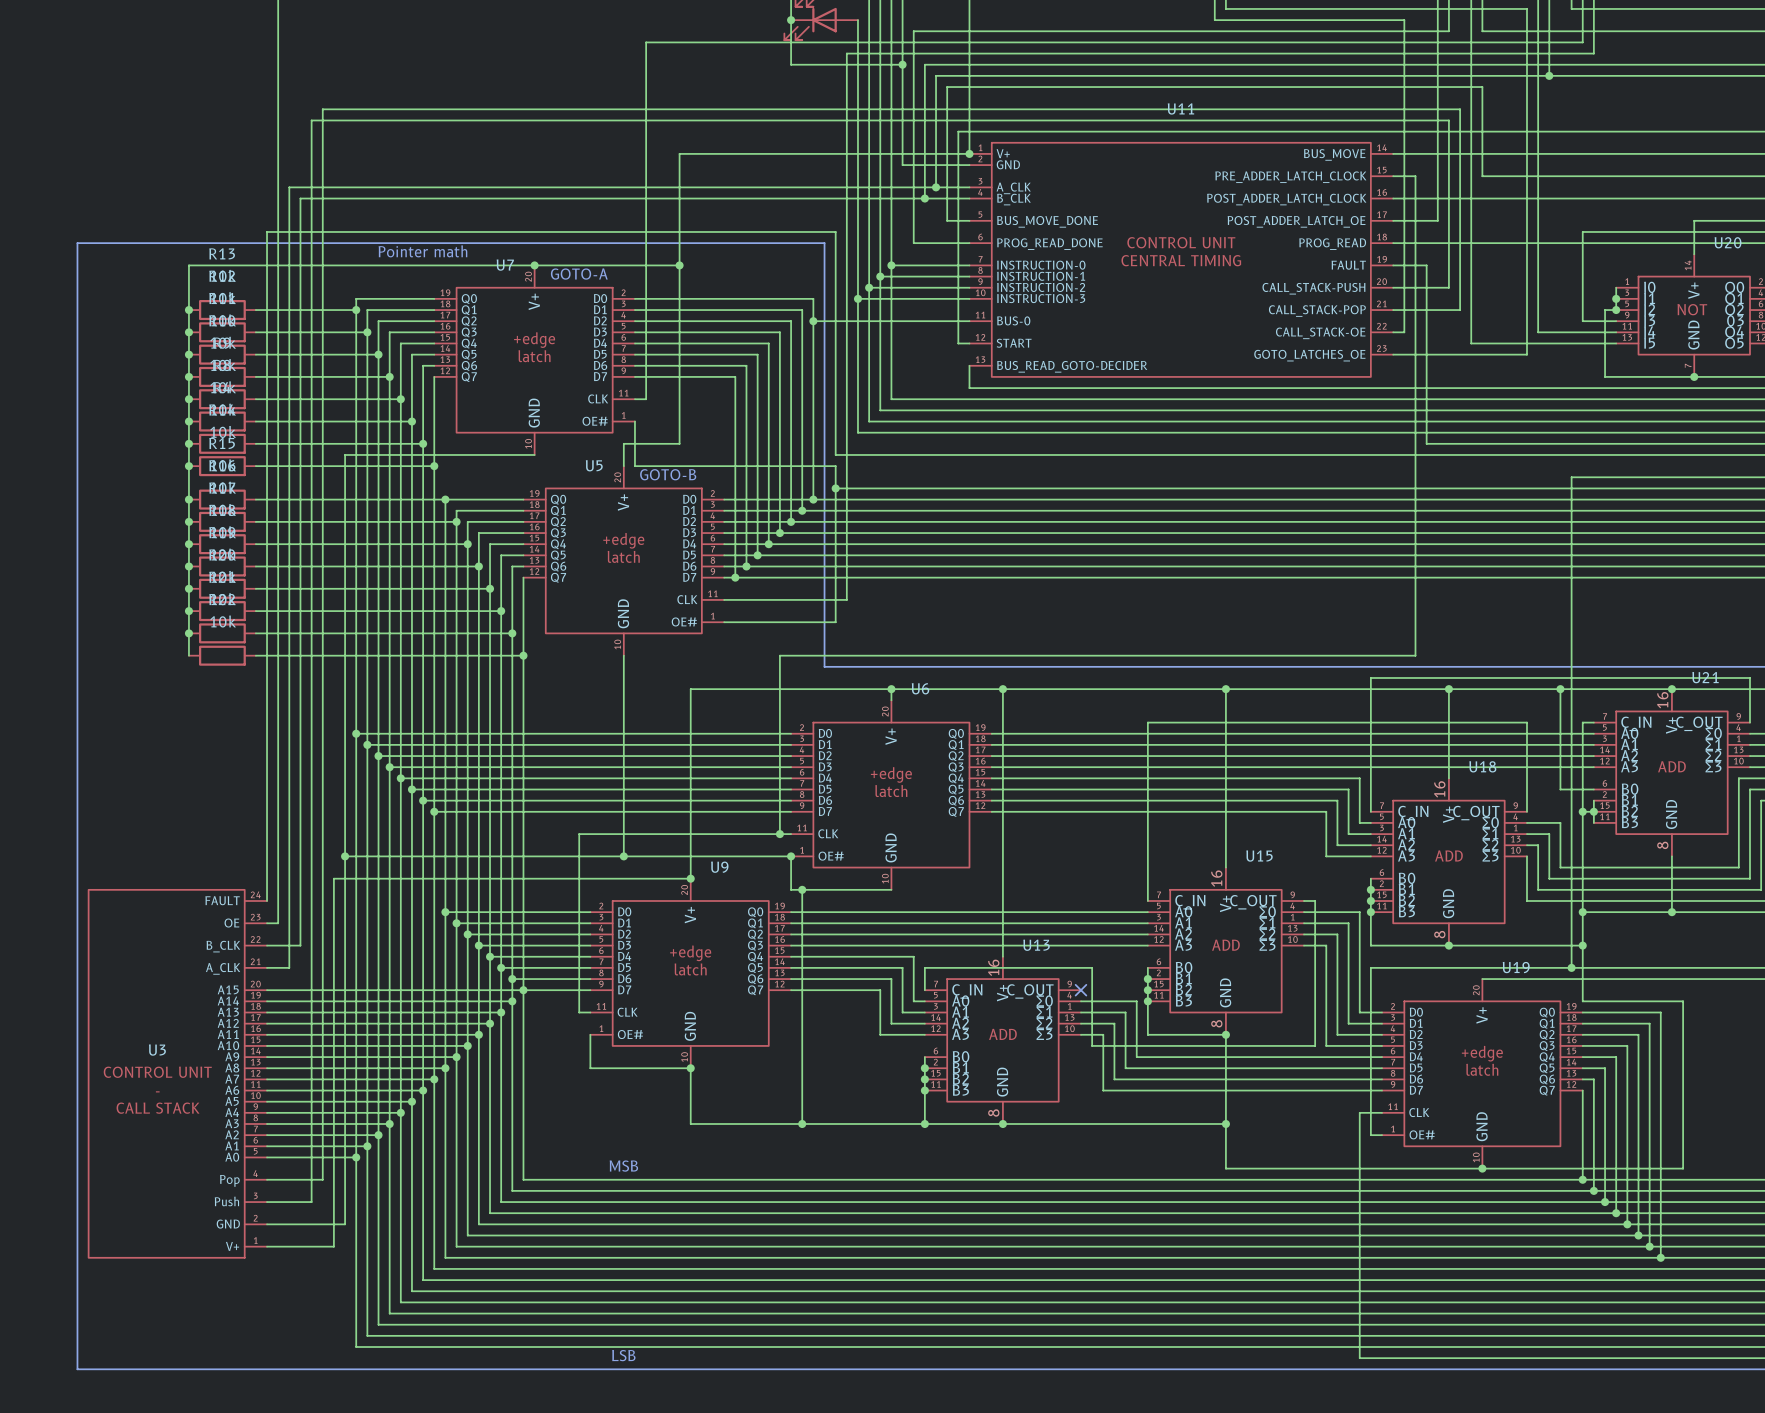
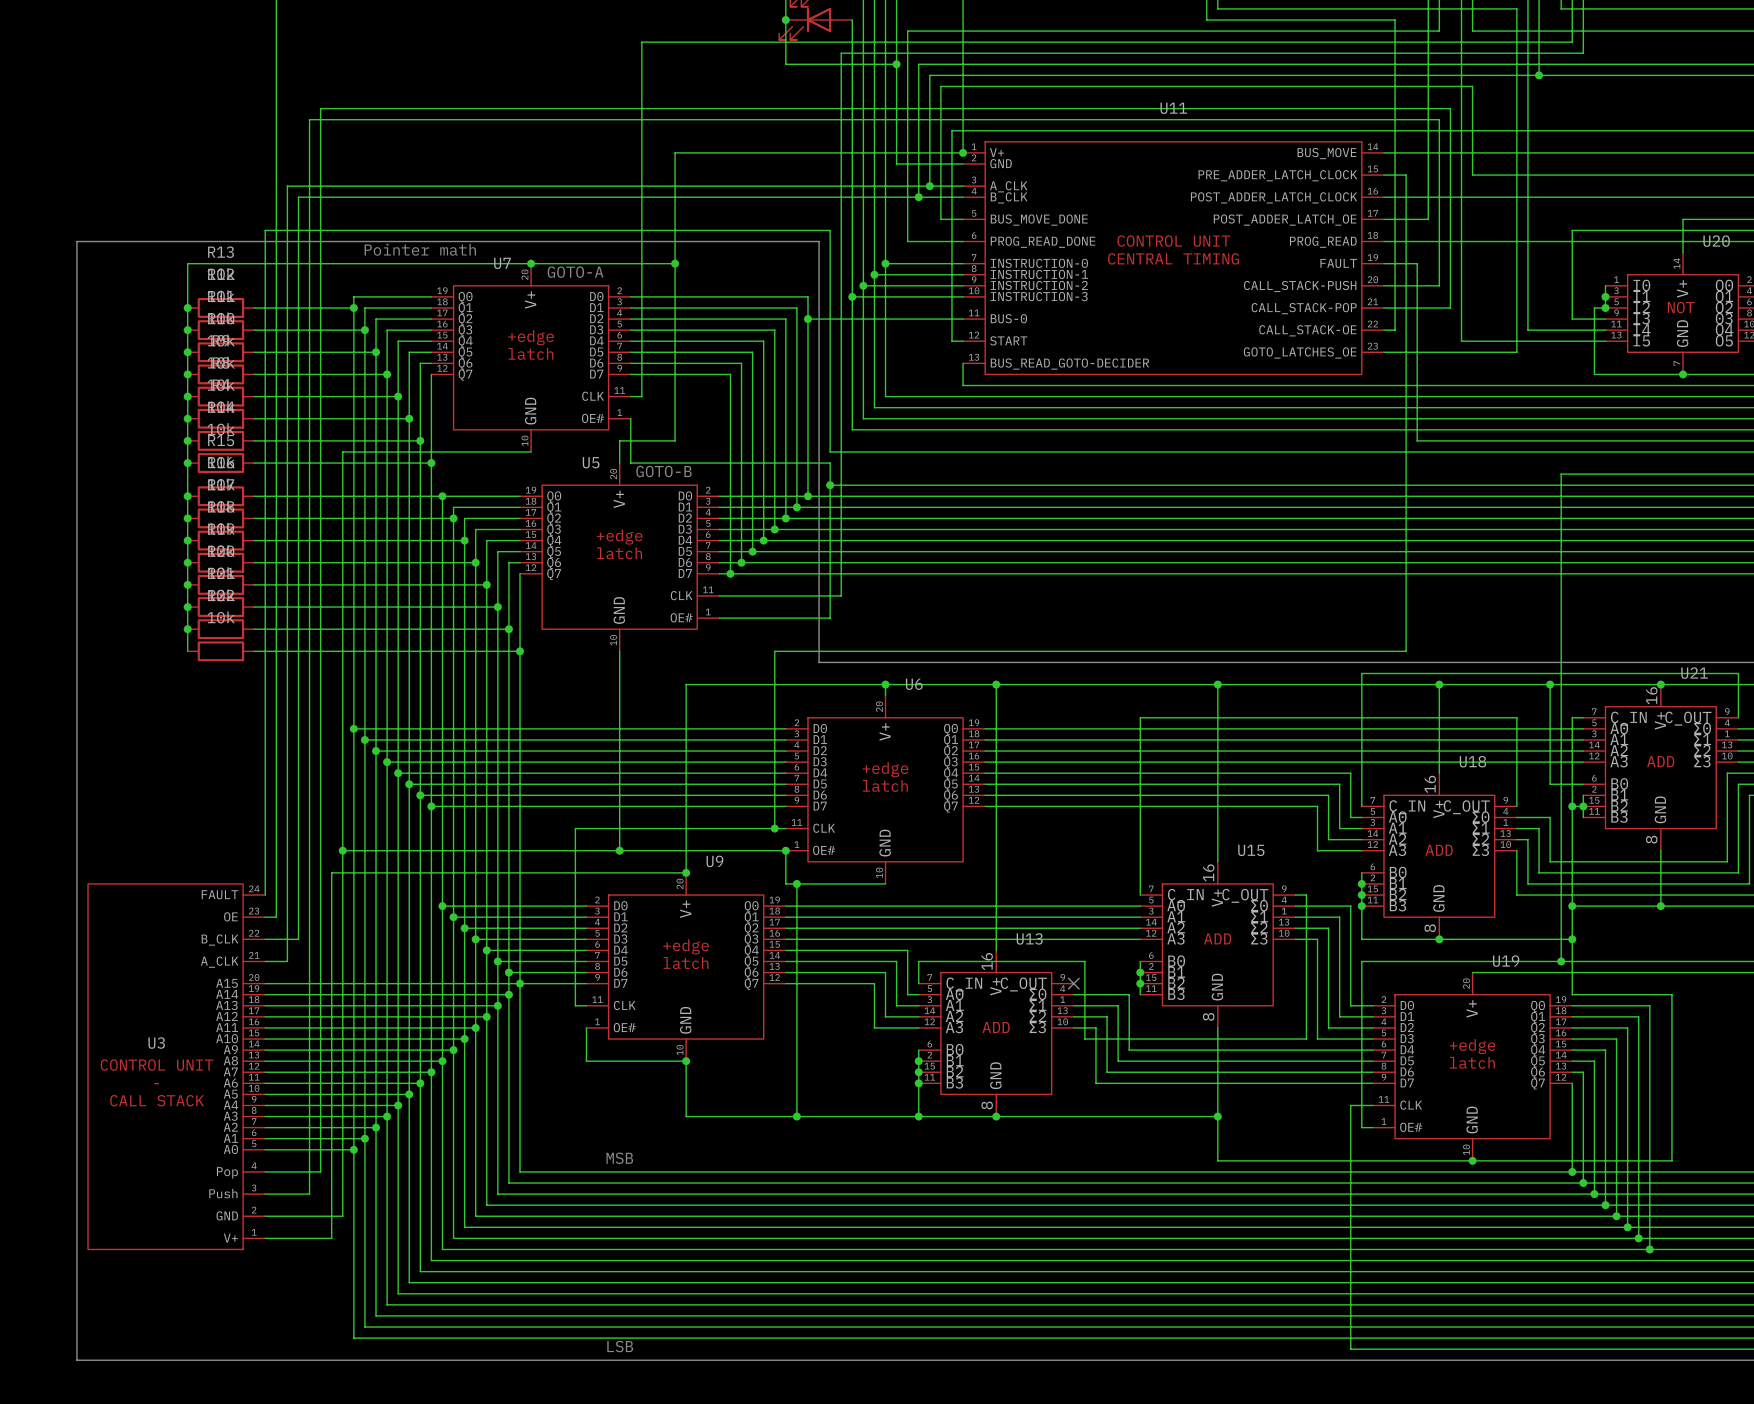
wire: (1147, 1001) (1147, 1034) (1225, 1034) -> none
junction: (1147, 1001) -> none
junction: (1225, 1034) -> none

